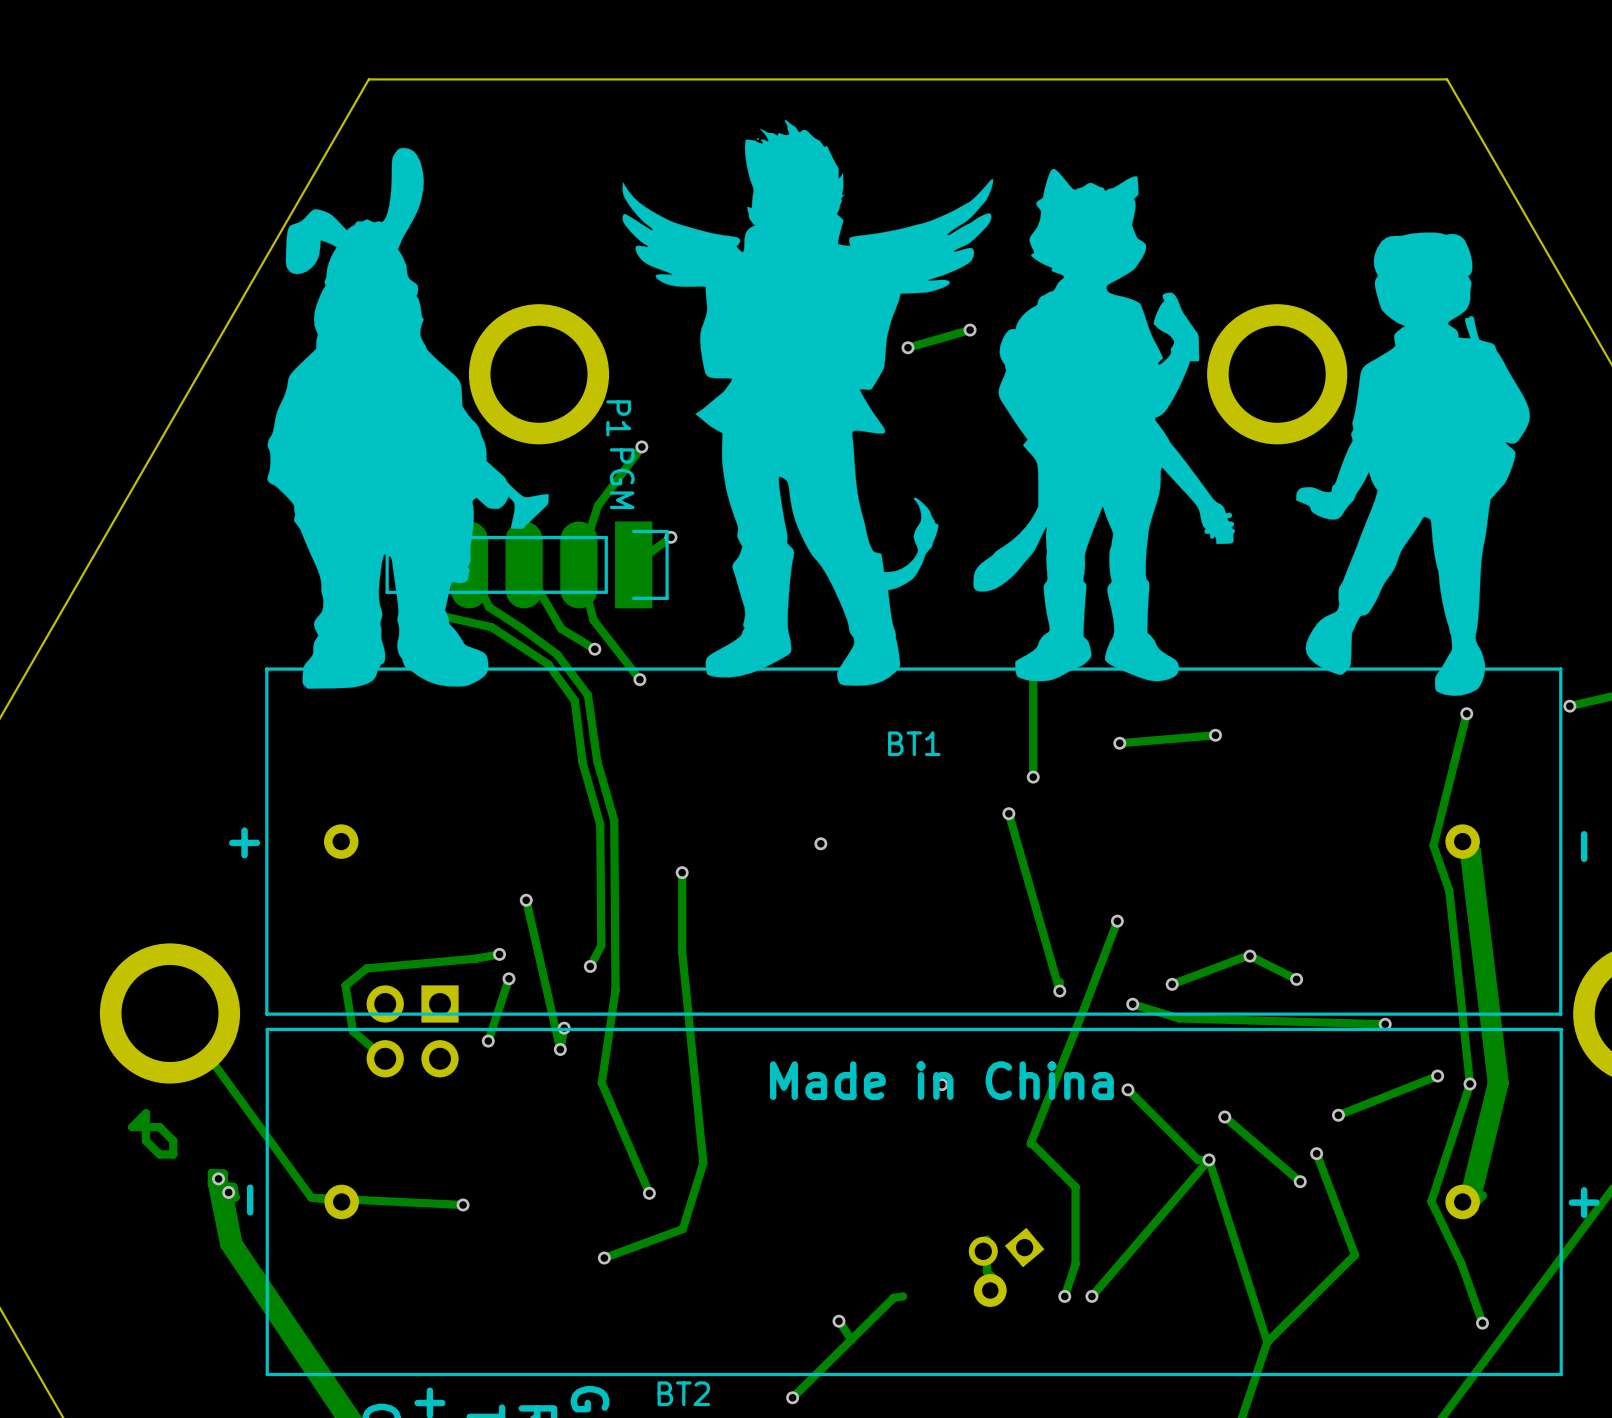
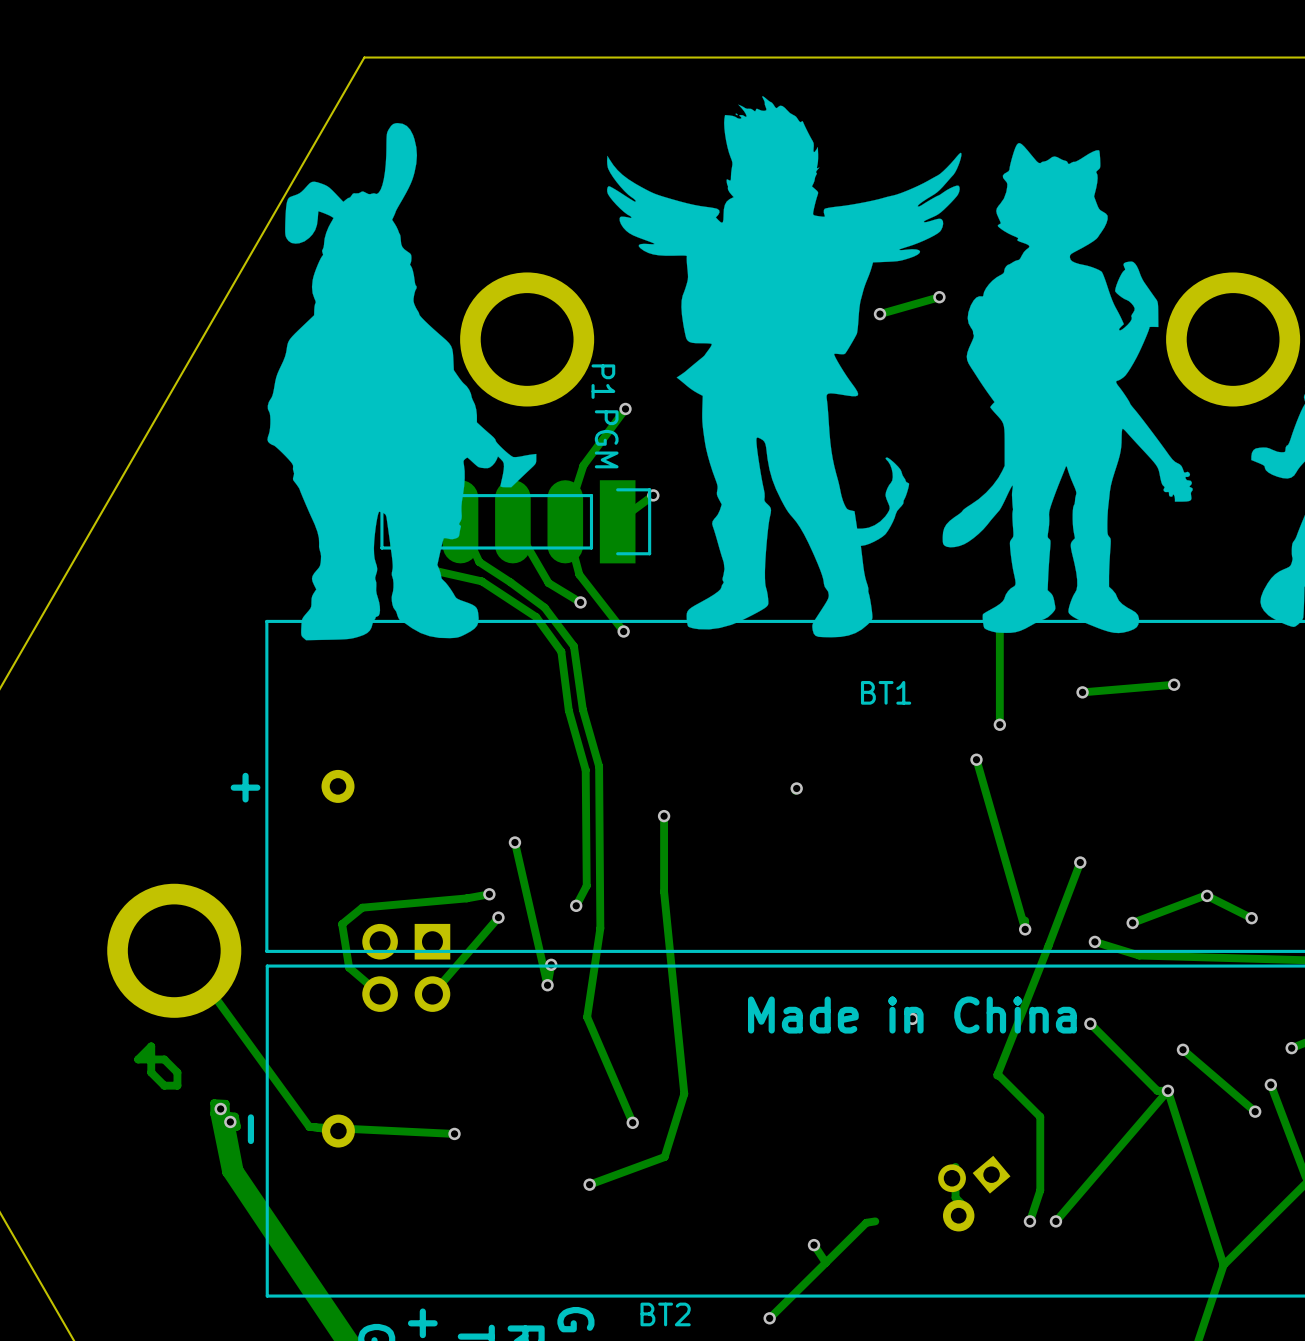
track: (509, 978) (488, 1041) -> (498, 917) (432, 994)
via: (488, 1041) -> none

